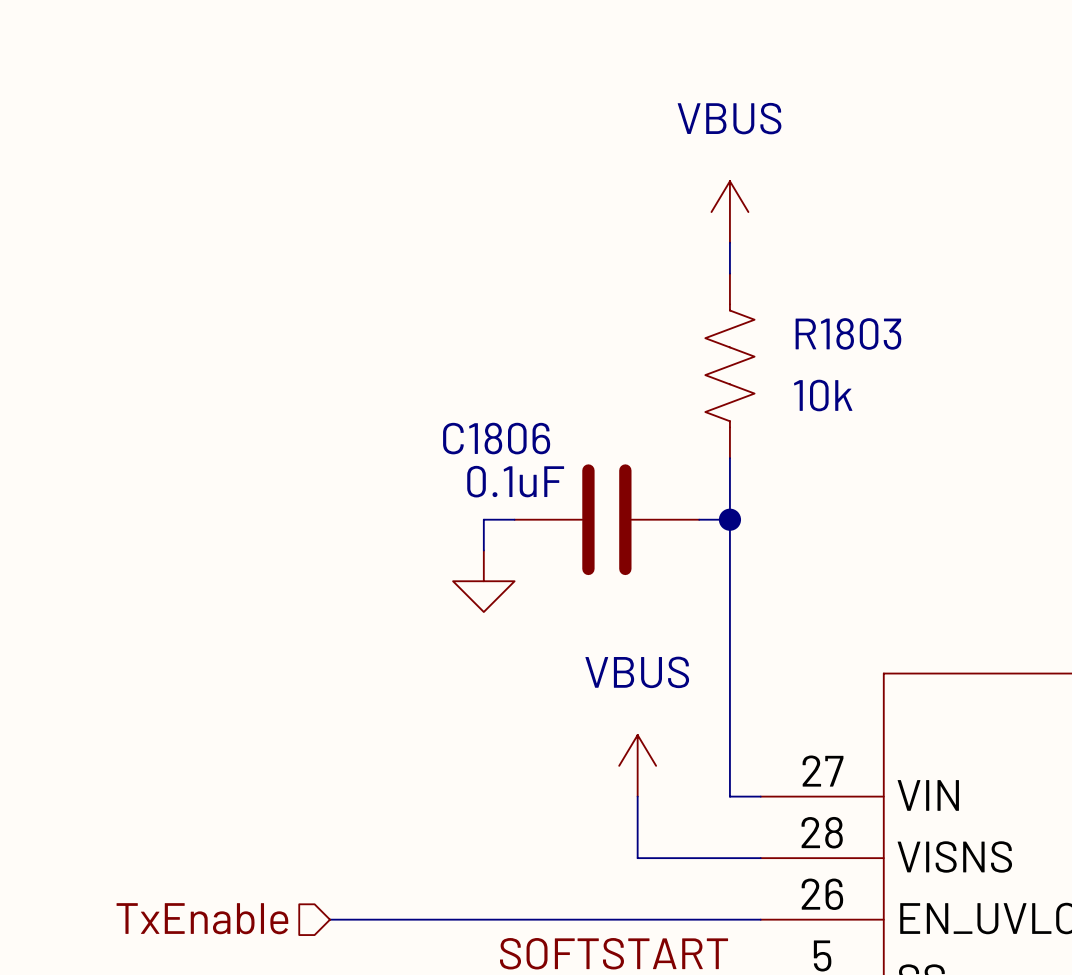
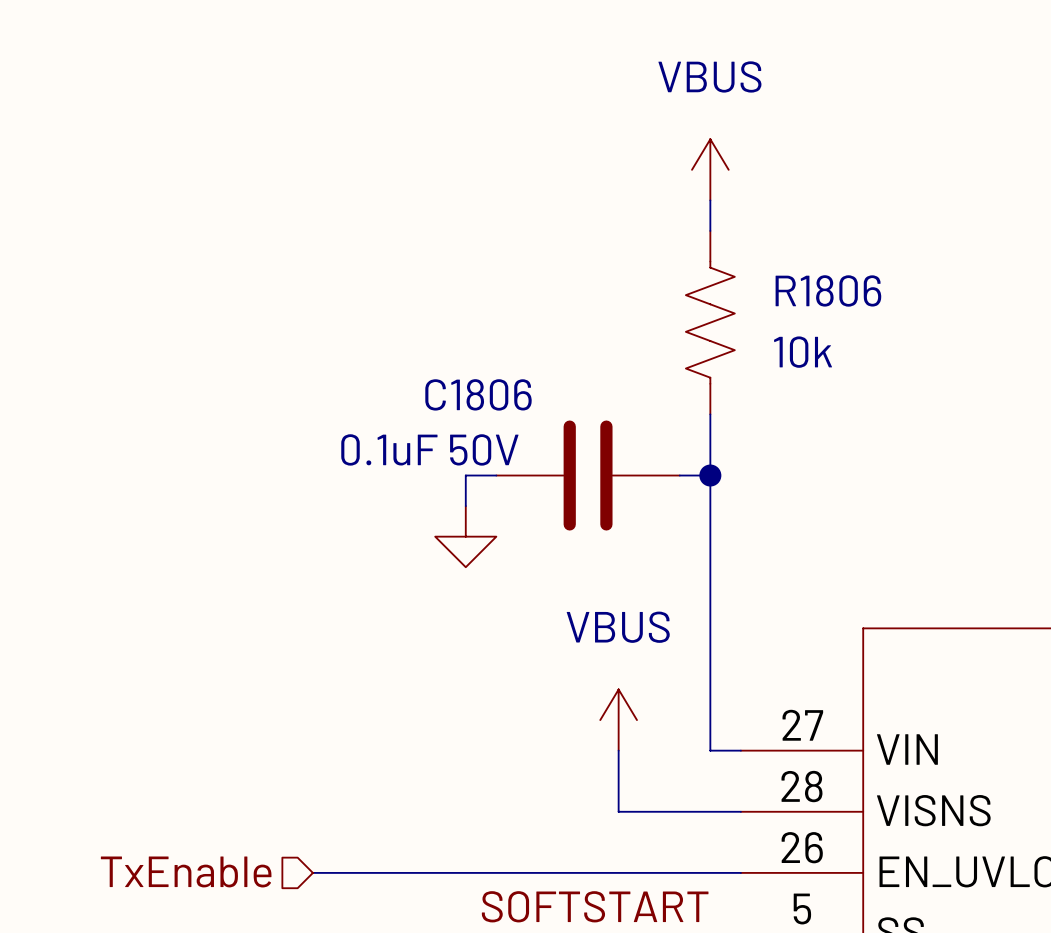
R1803 name: R1803 (848, 333) -> R1806 (828, 290)
C1806 value: 0.1uF (515, 481) -> 0.1uF 50V (429, 449)

